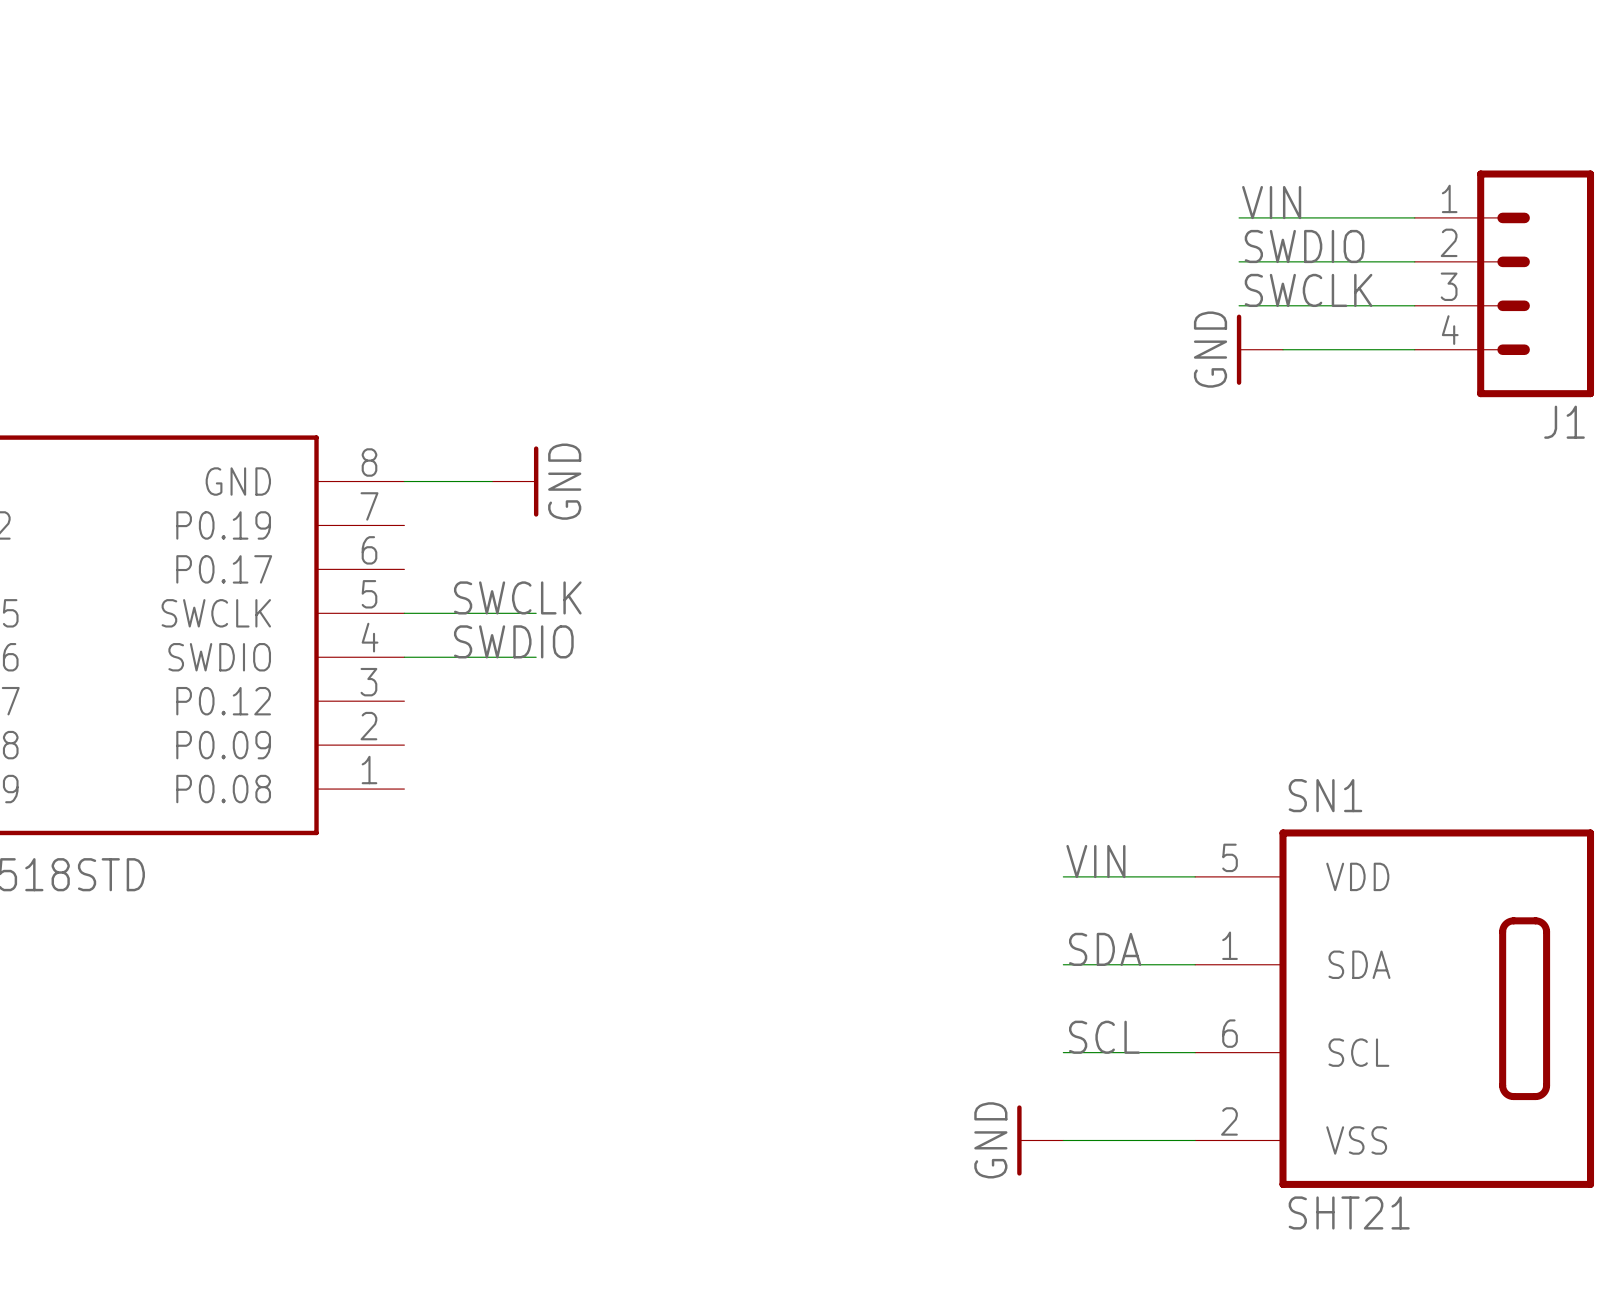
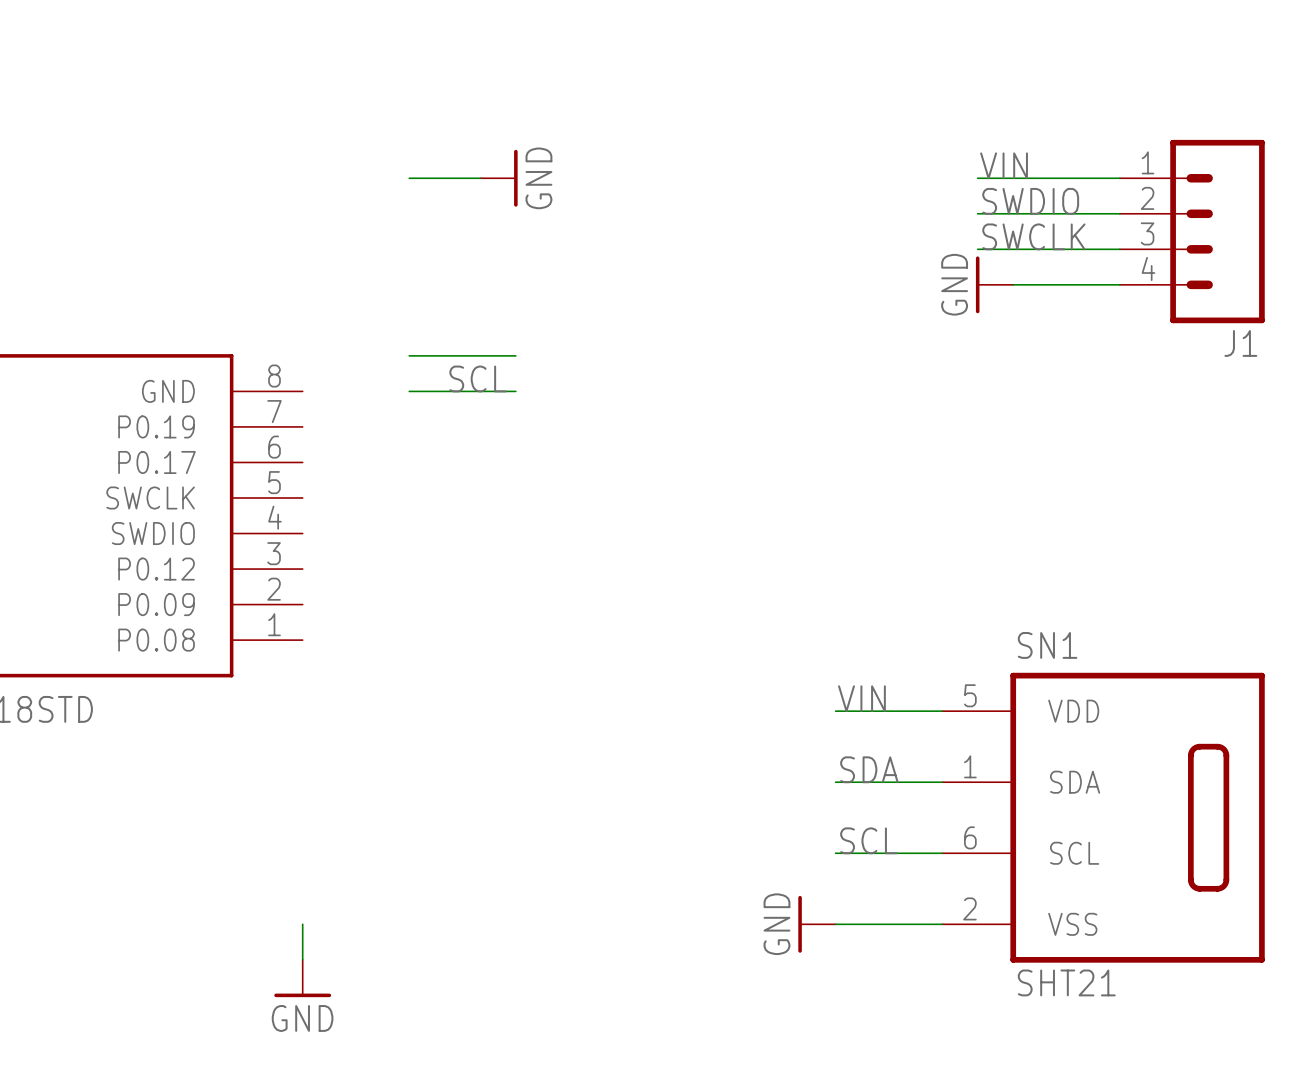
label: none -> SCL (478, 378)
wire: (404, 481) (492, 481) -> (409, 178) (480, 178)
power symbol position: GND (515, 481) -> GND (498, 178)
label: SWCLK (517, 597) -> none
wire: (404, 613) (536, 613) -> (409, 355) (515, 355)
label: SWDIO (513, 641) -> none
wire: (404, 657) (536, 657) -> (409, 391) (515, 391)
wire: none -> (302, 924) (302, 959)
power symbol: none -> GND (302, 978)

